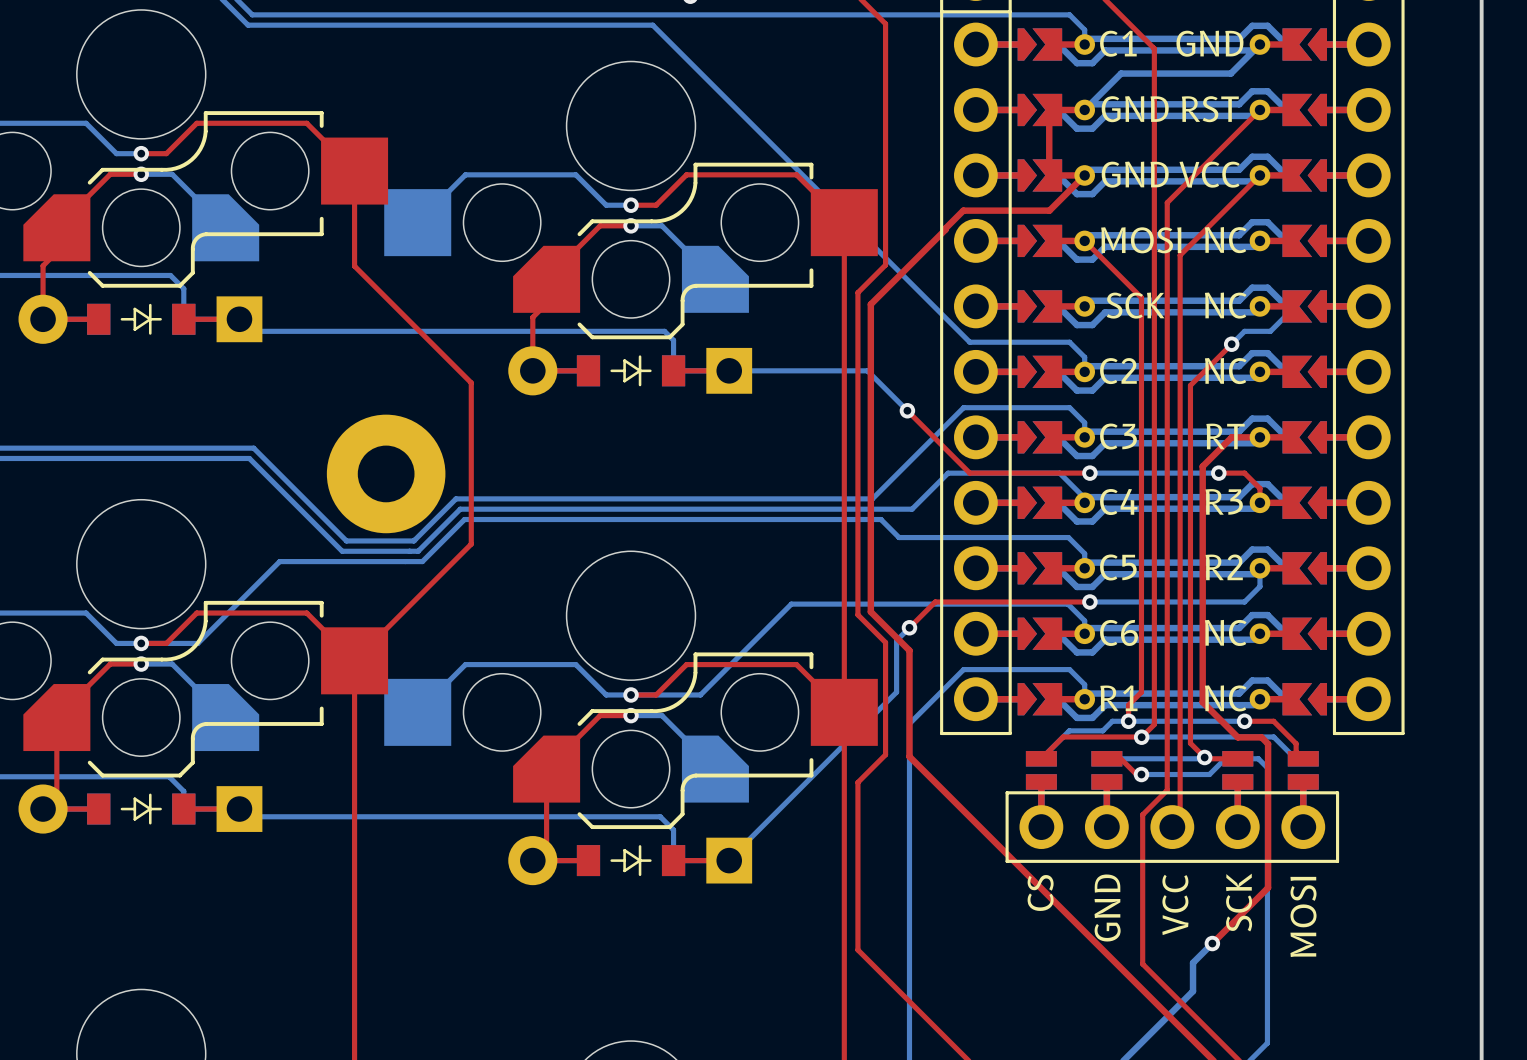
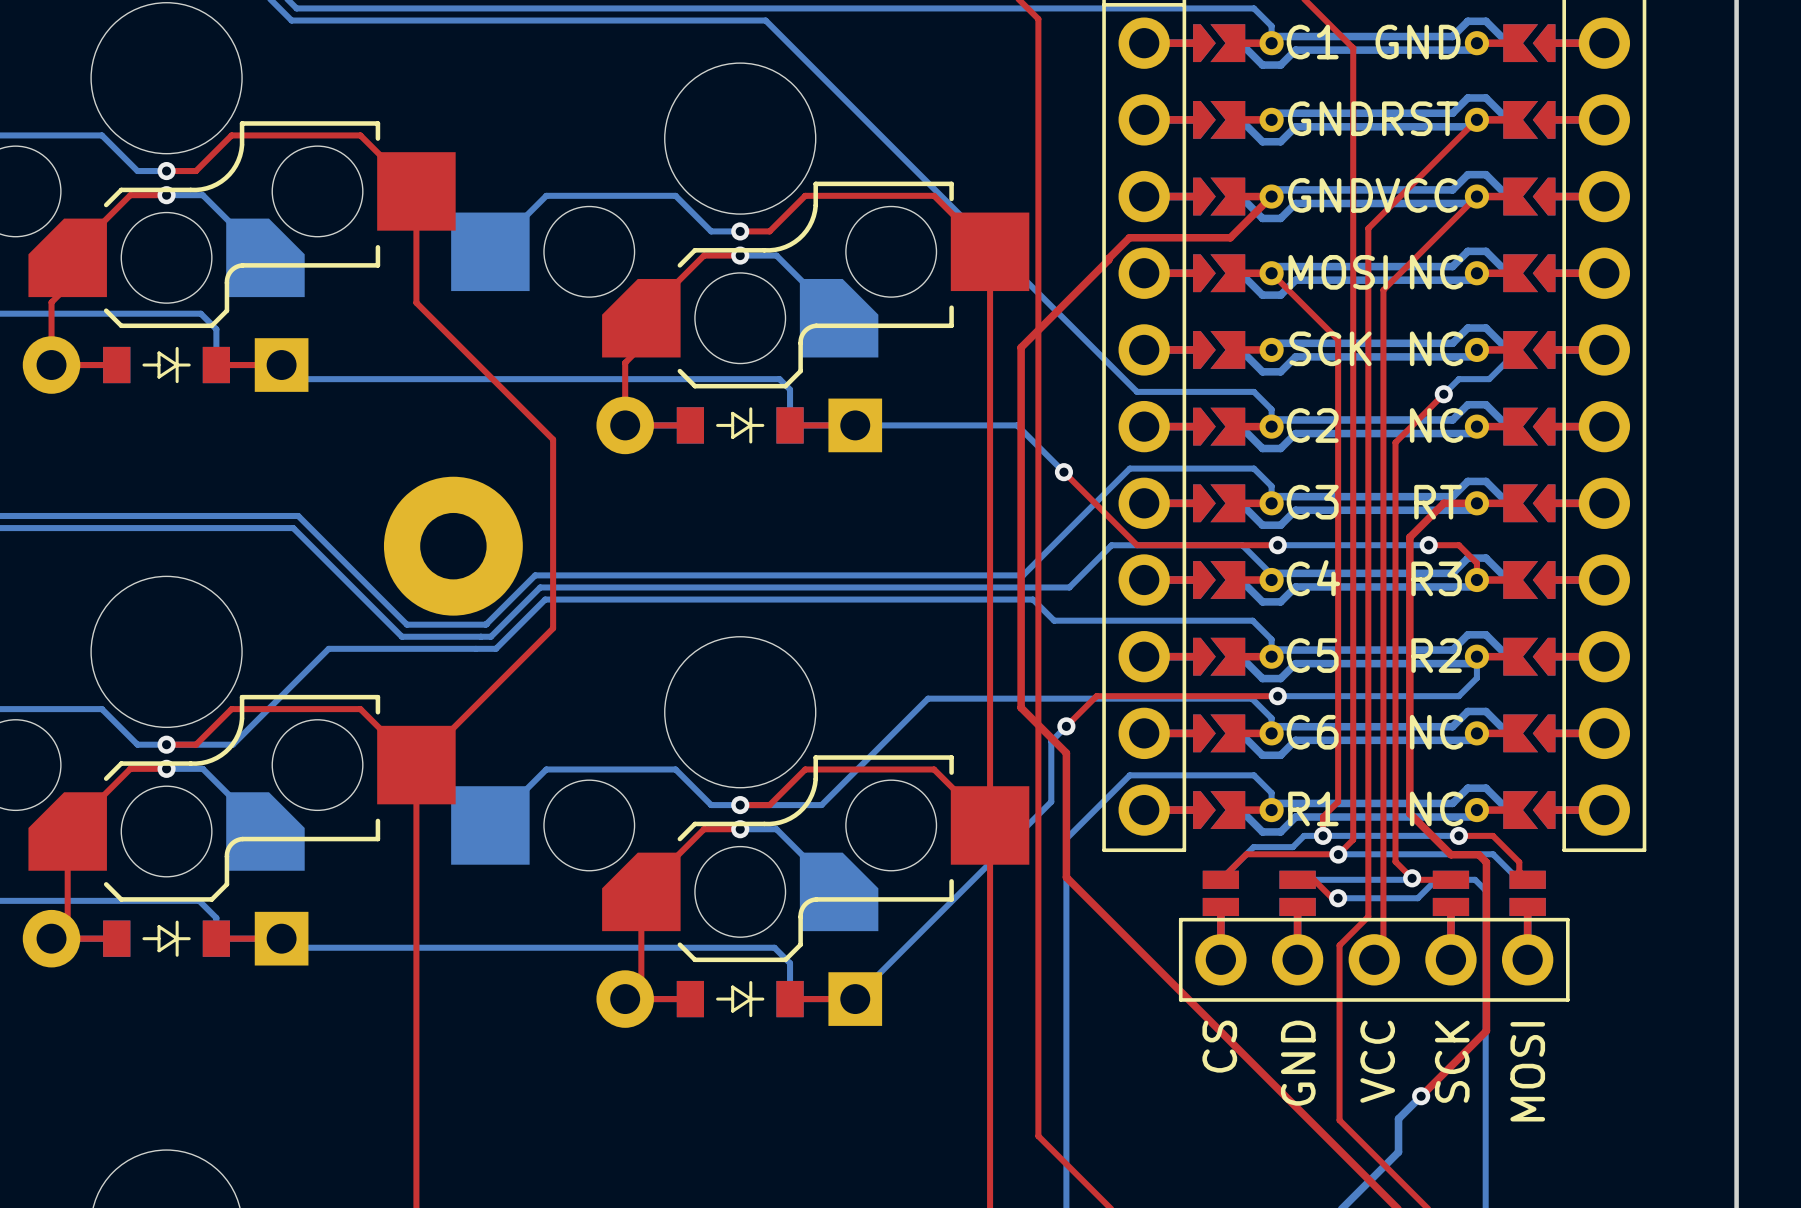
bottom track: (1259, 44) (1230, 73) (1121, 73) (1084, 109) -> none
top track: (1049, 109) (1049, 175) -> none
top track: (885, 265) (857, 292) (857, 614) (885, 642) -> (1038, 301) (1038, 743)
top track: (885, 754) (857, 782) (857, 949) (885, 977) -> (1038, 875) (1038, 1136)

